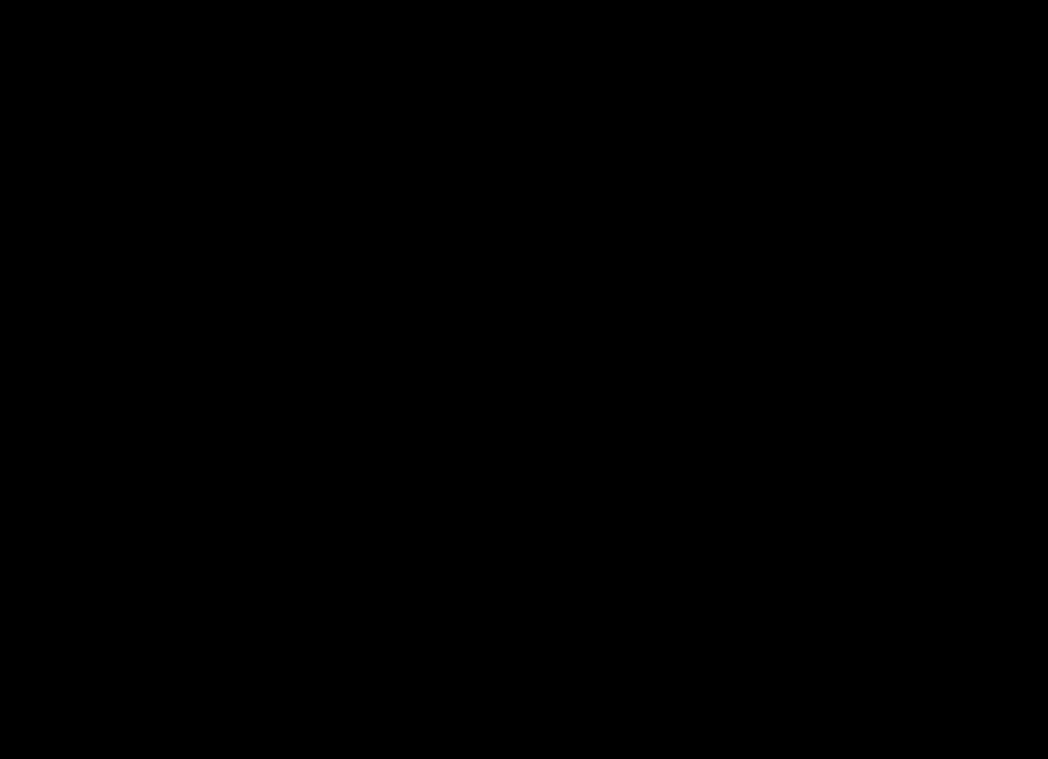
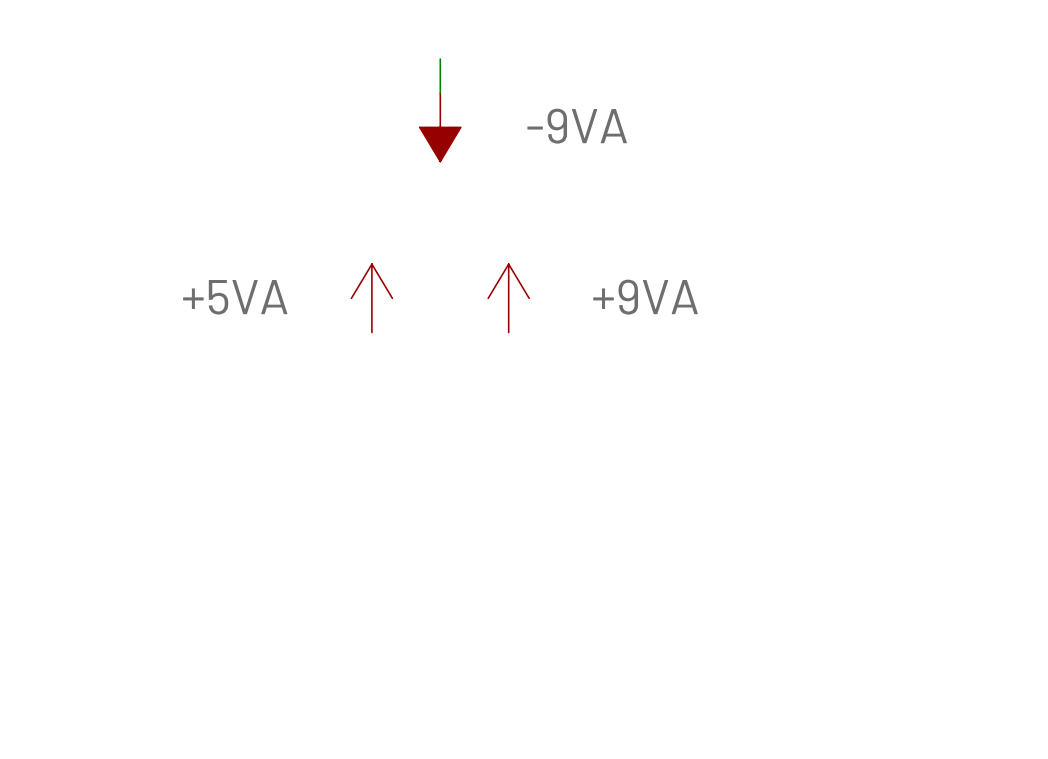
wire: none -> (440, 59) (440, 93)
power symbol: none -> -9VA (440, 127)
power symbol: none -> +5VA (371, 298)
power symbol: none -> +9VA (508, 298)

